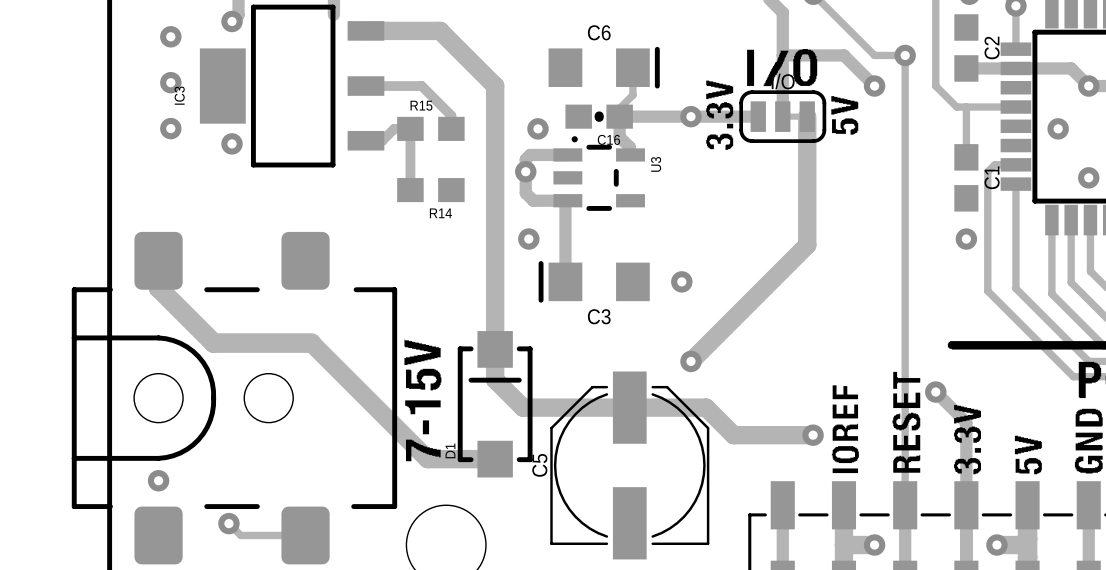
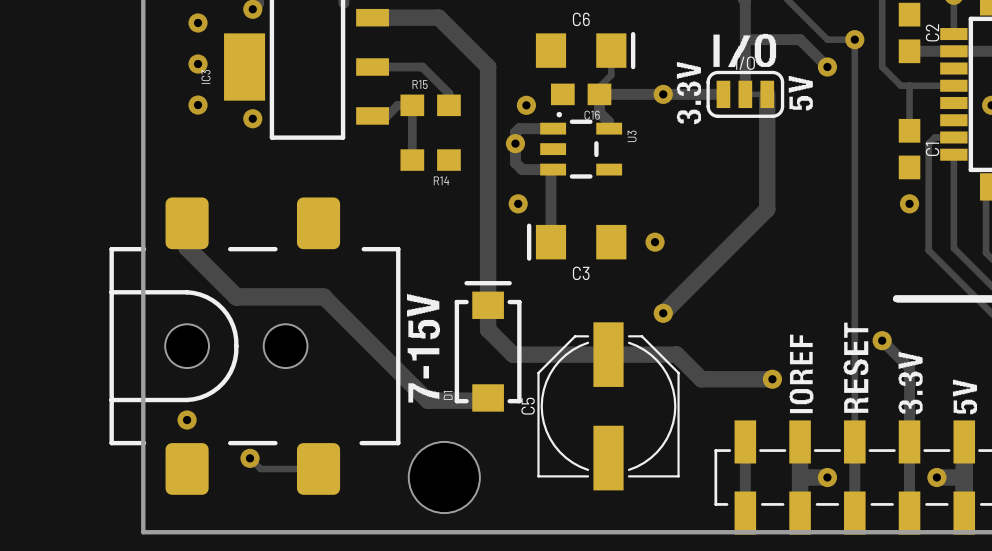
C16 footprint: [565, 104, 633, 129] -> [550, 83, 612, 106]
D1 footprint: [457, 331, 533, 478] -> [454, 281, 522, 412]

